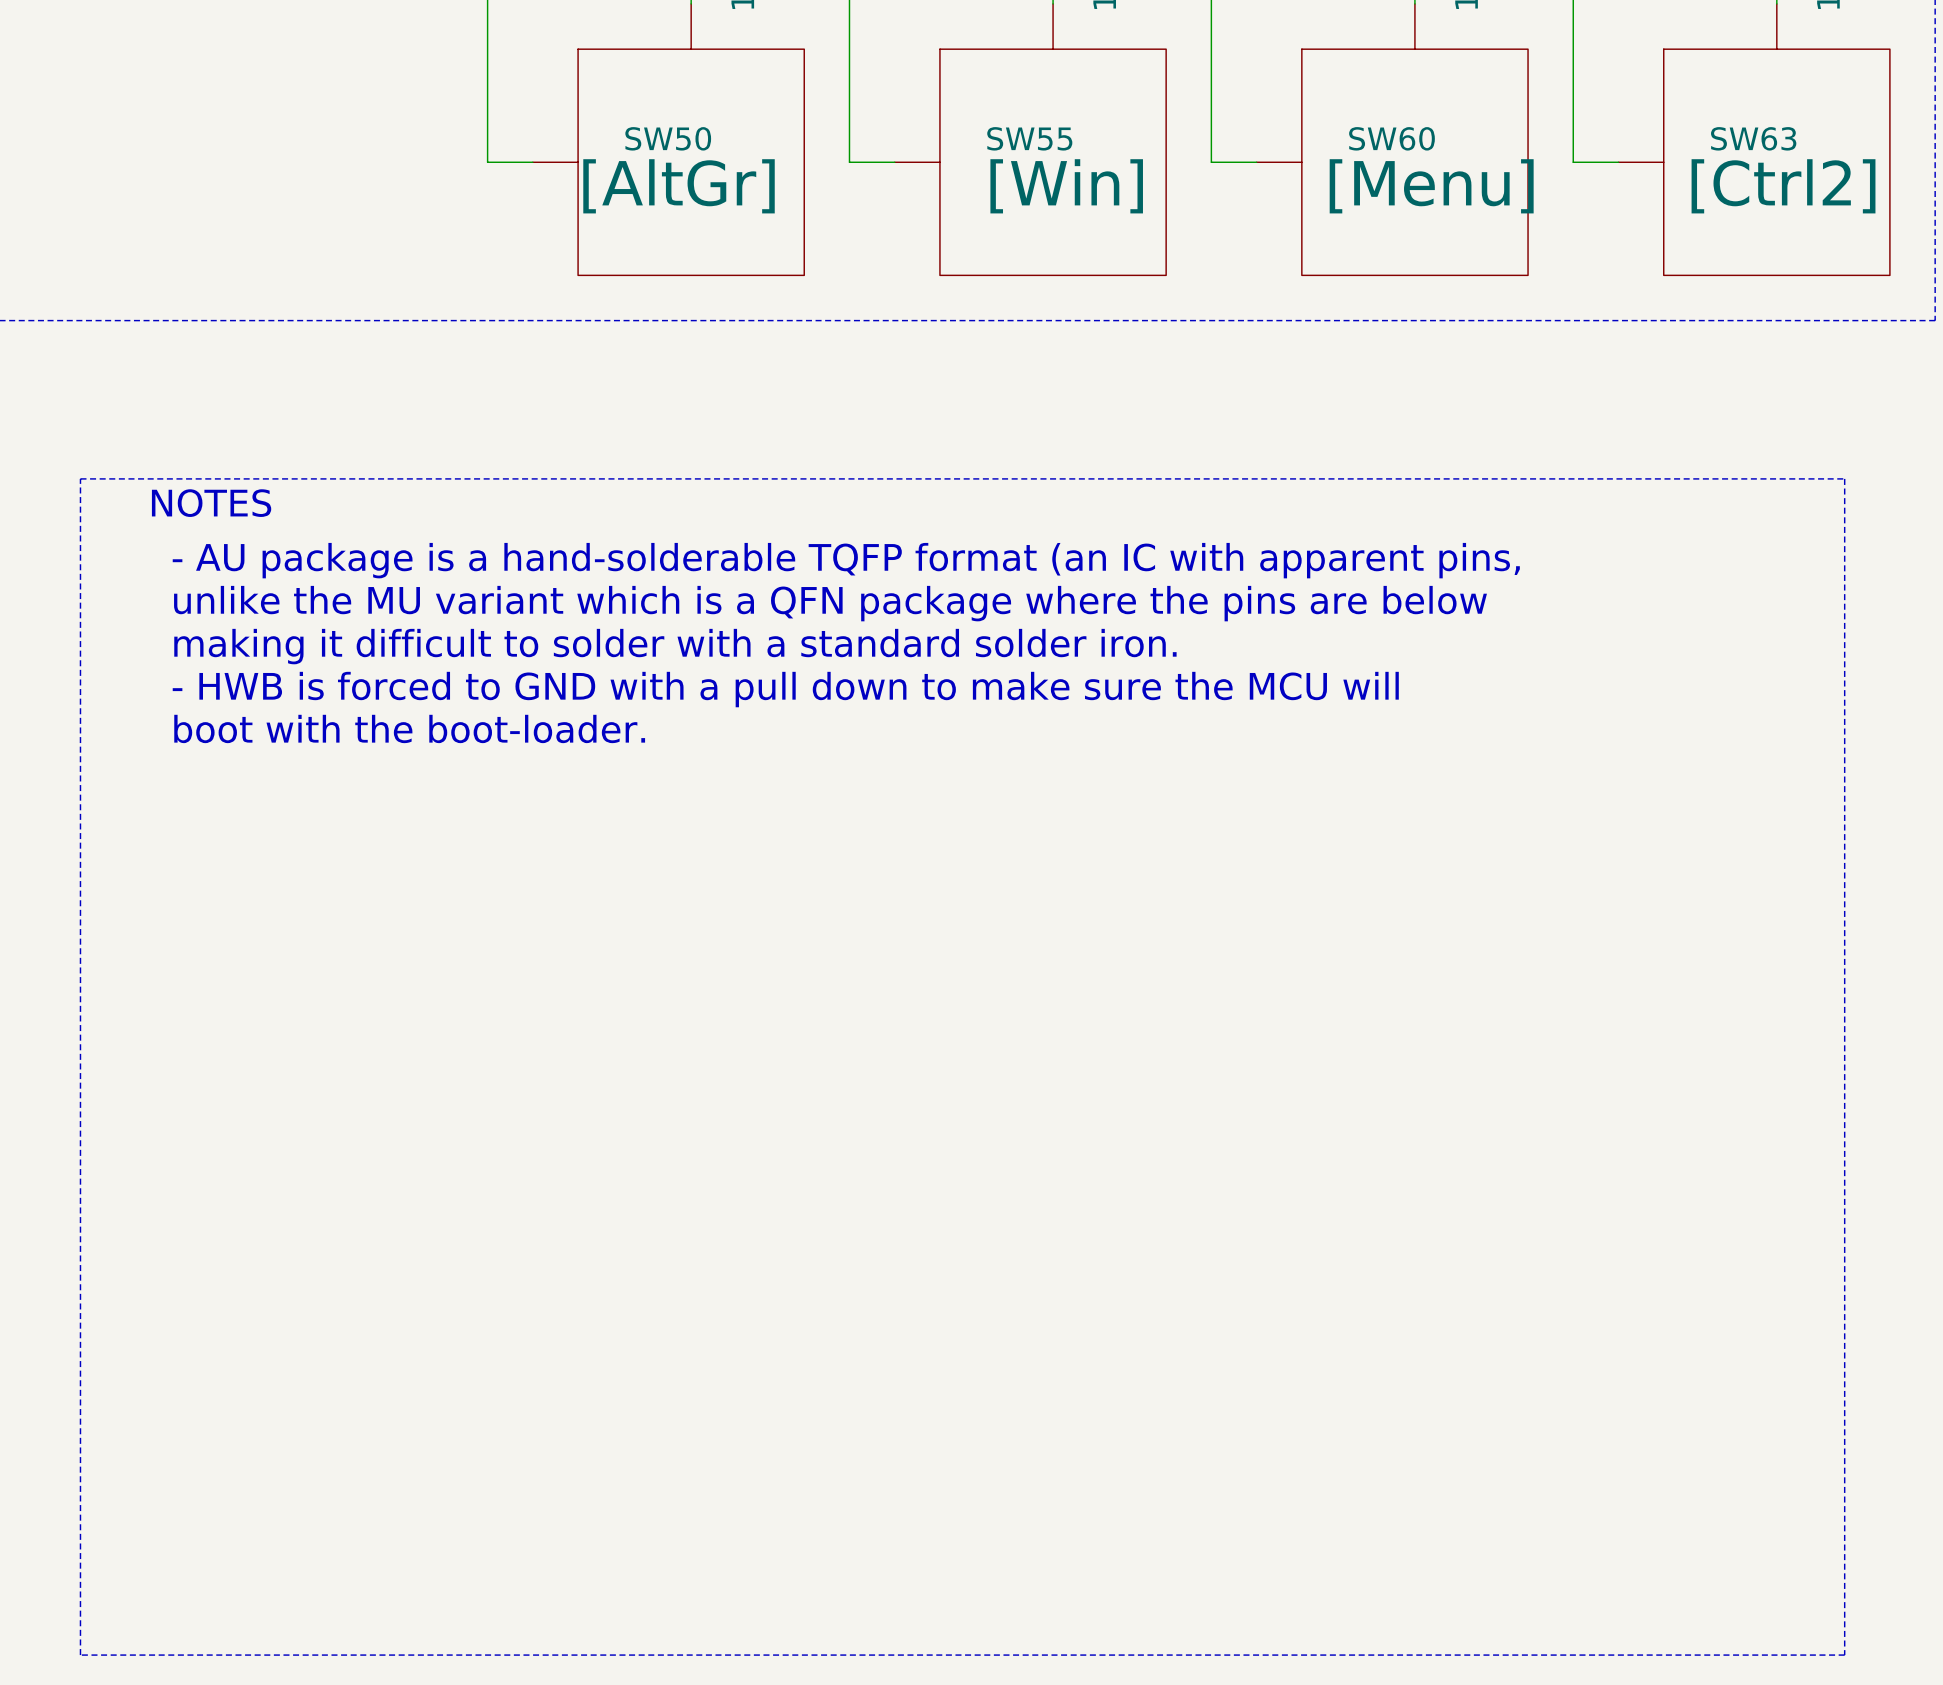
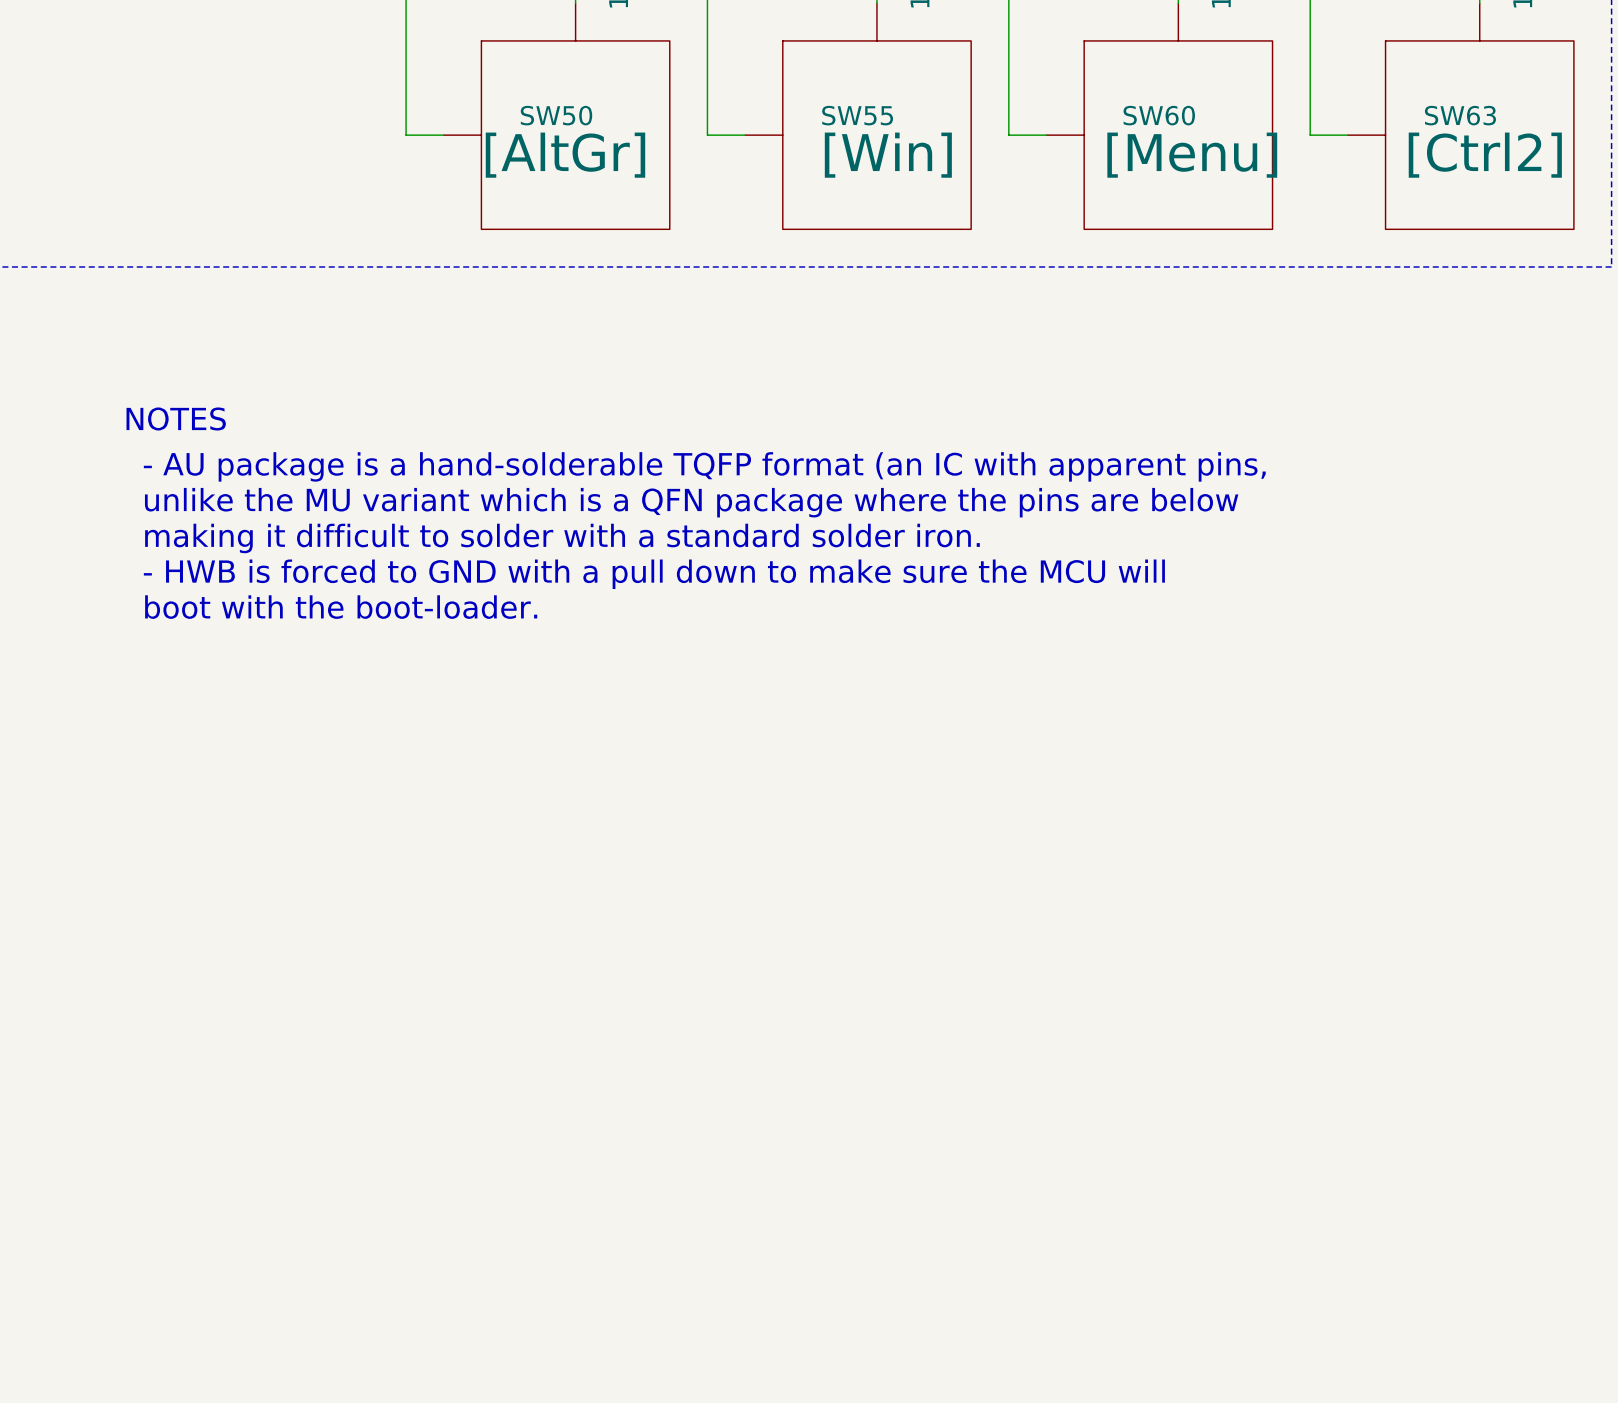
line: (80, 478) (80, 1655) (1844, 1655) (1844, 478) (80, 478) -> none

